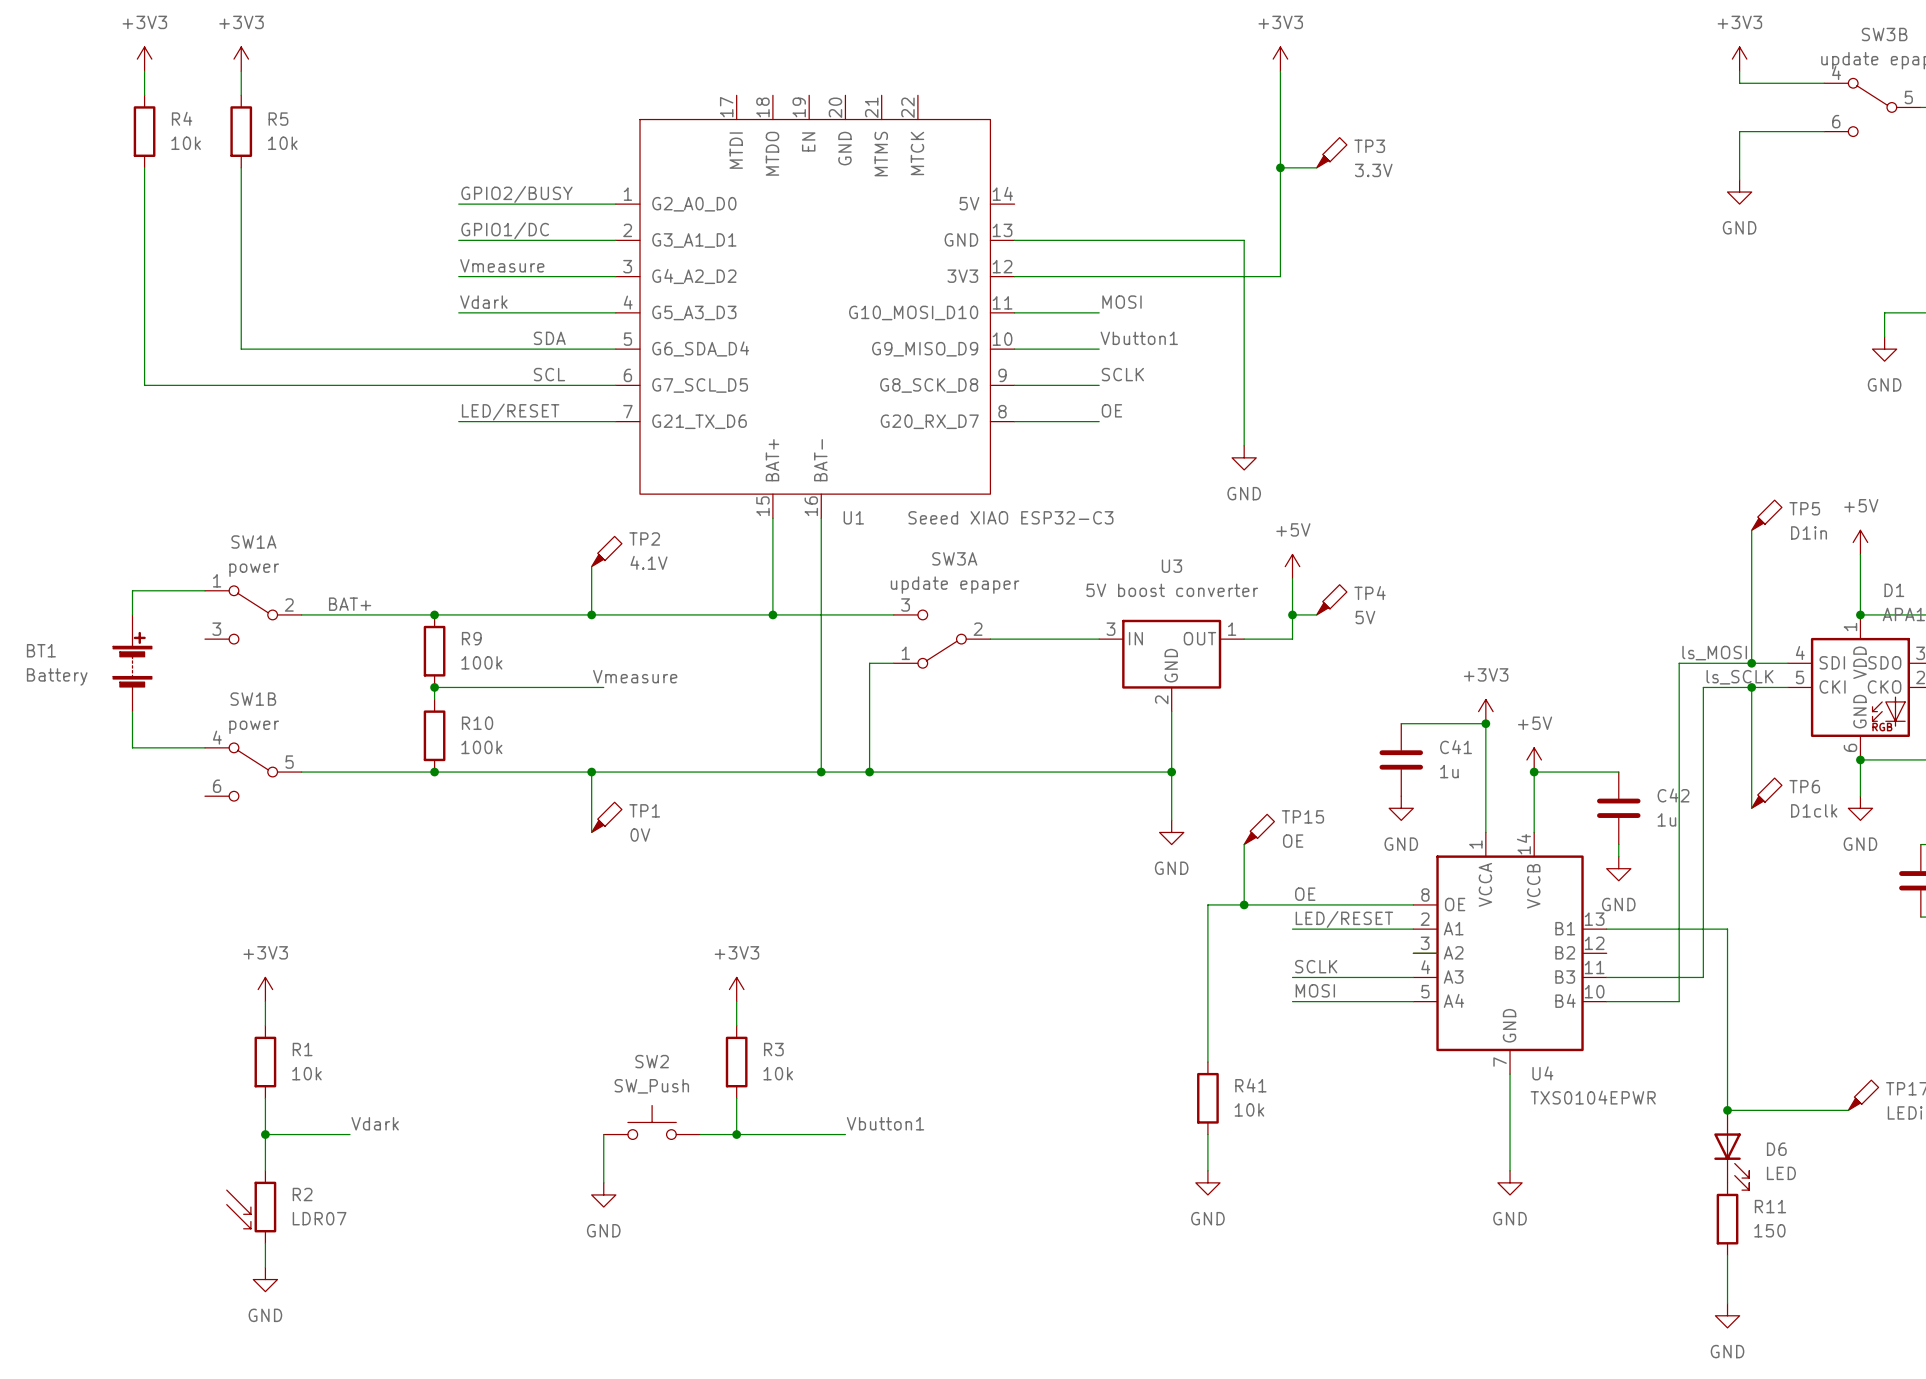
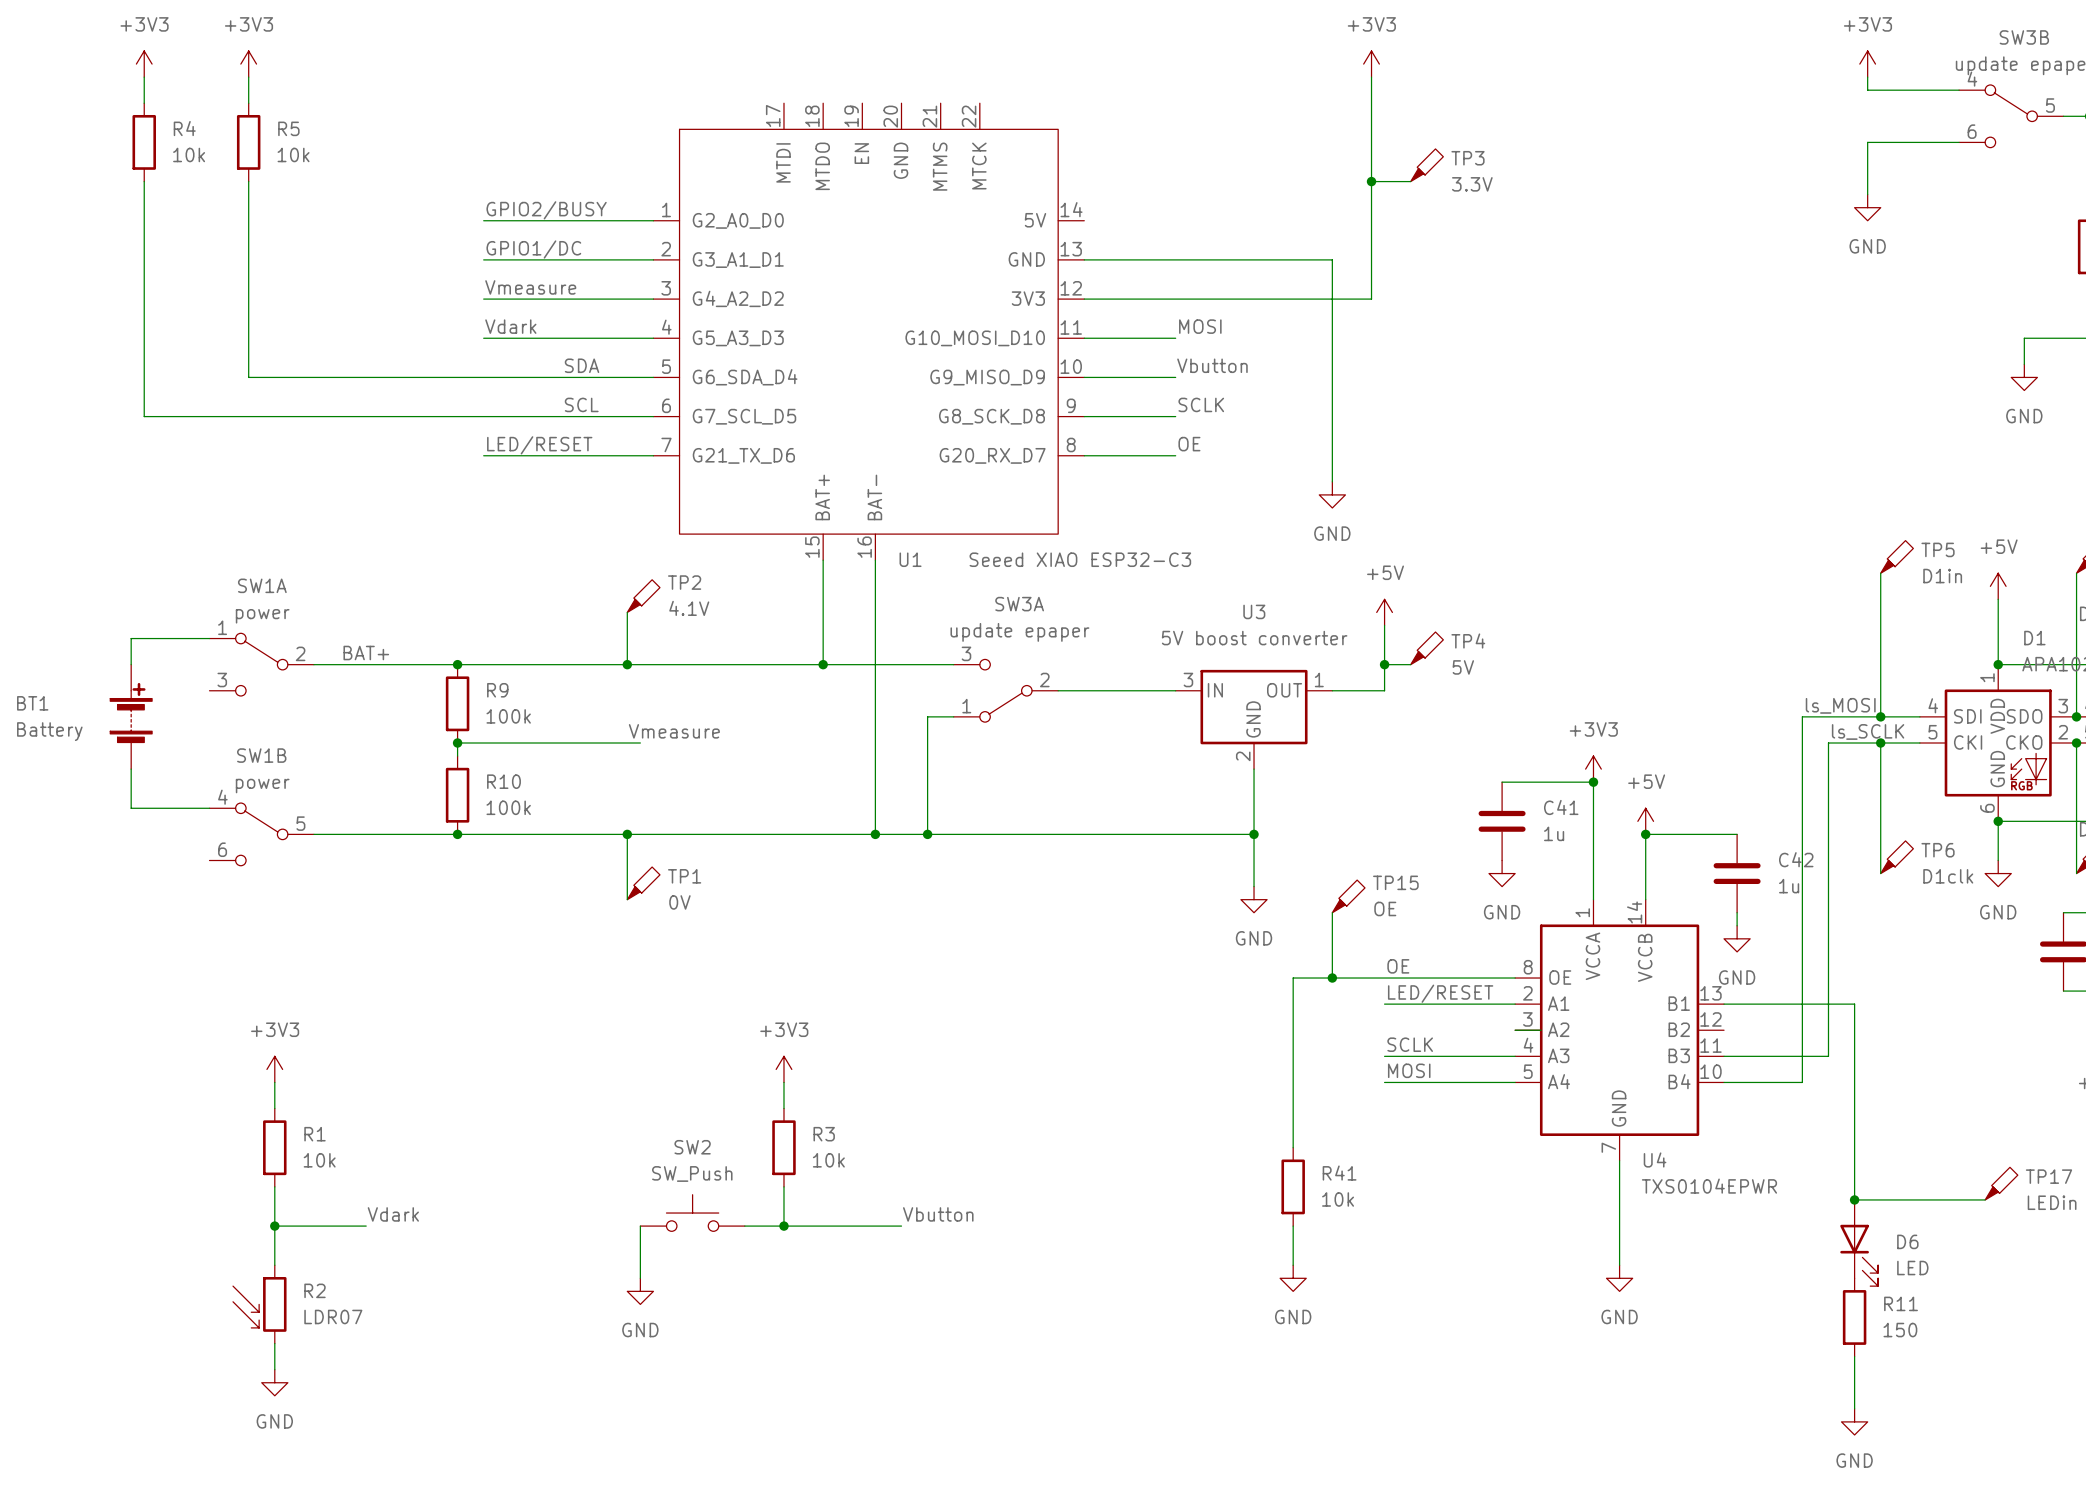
label: Vbutton1 (1139, 338) -> Vbutton (1212, 365)
label: Vbutton1 (885, 1123) -> Vbutton (938, 1214)

